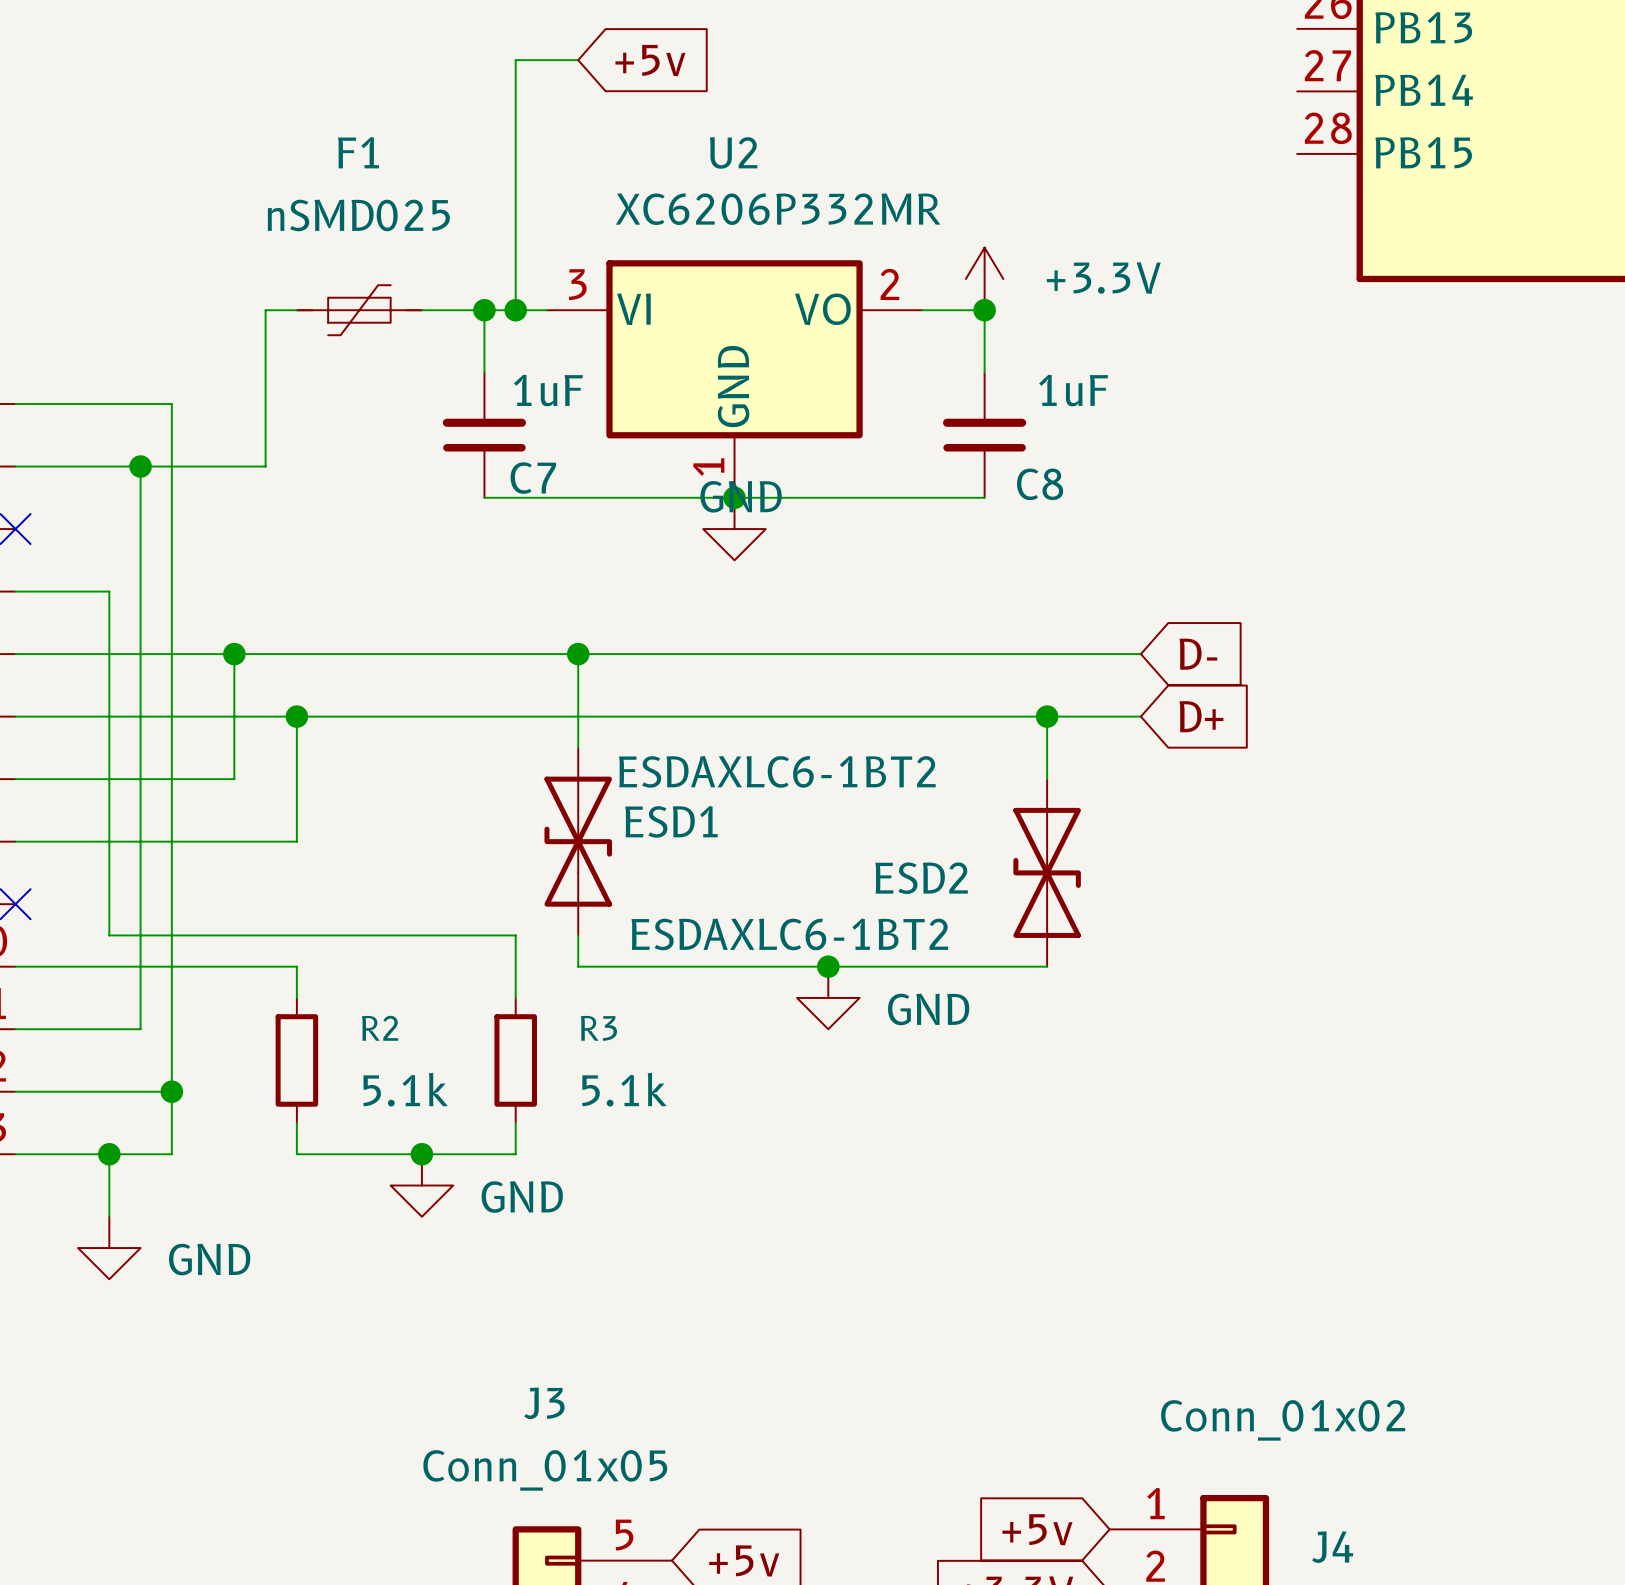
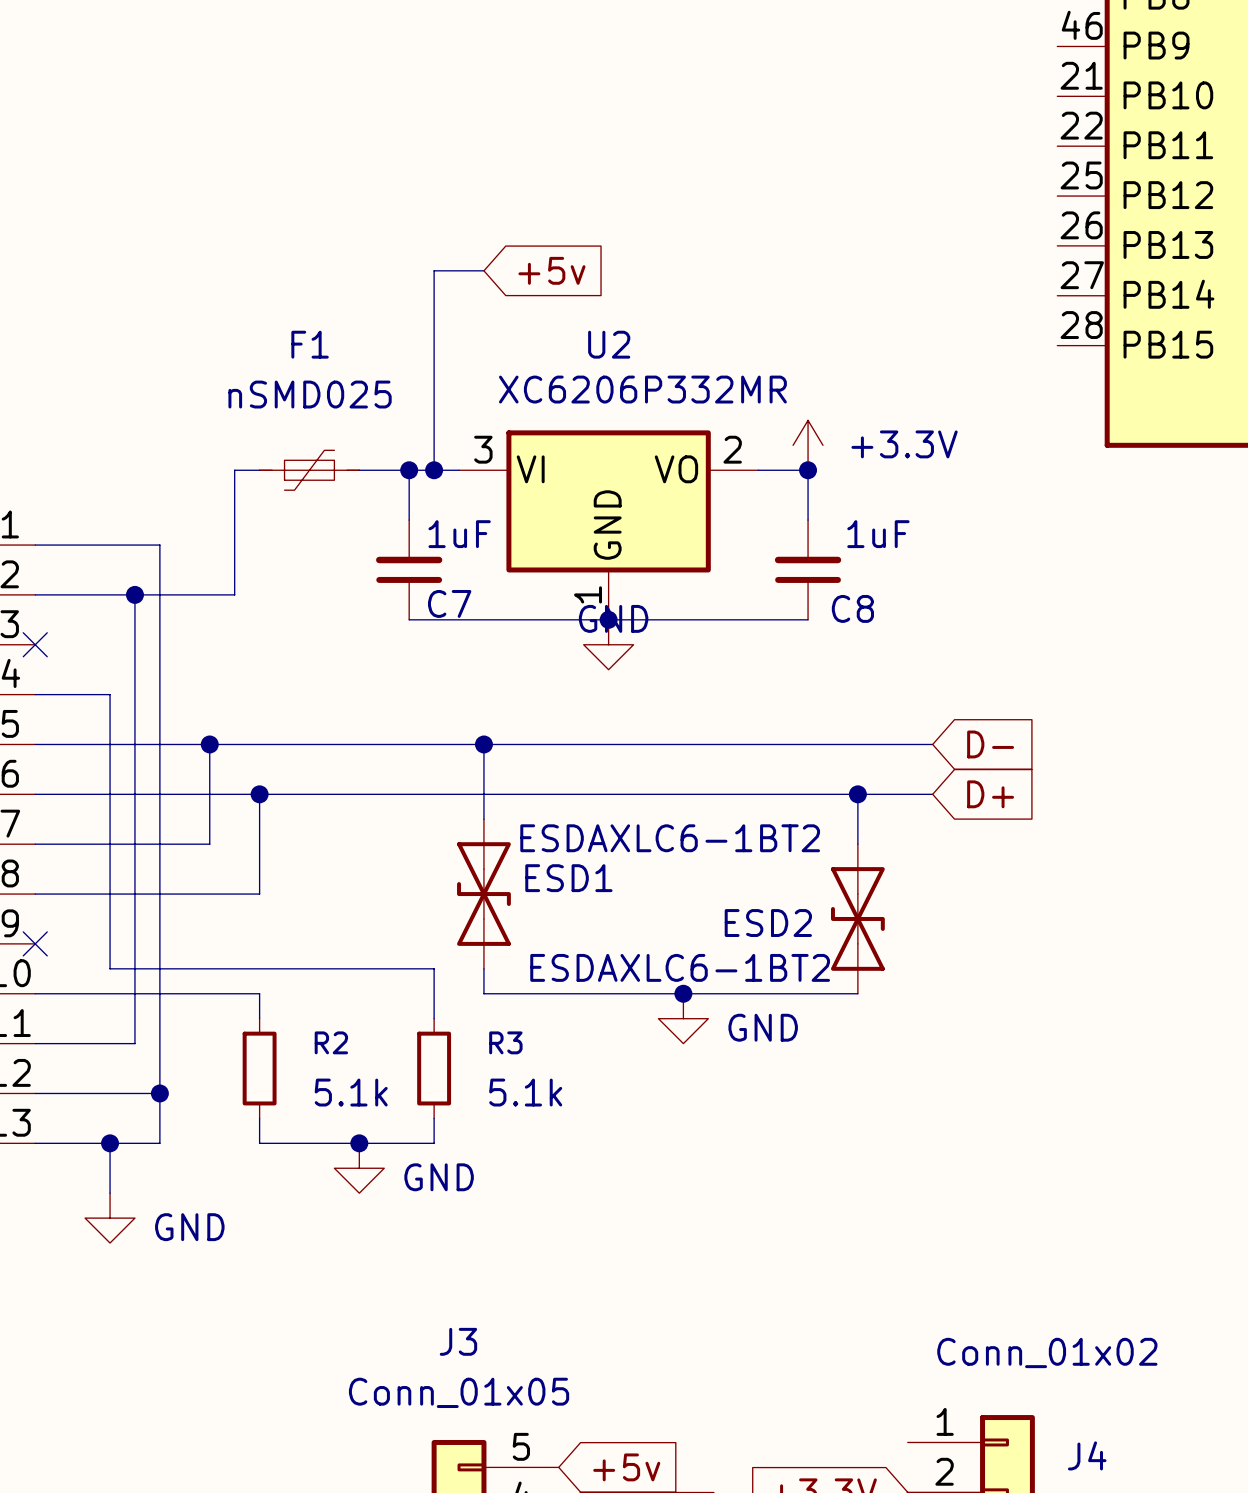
global label: +5v (1037, 1529) -> none

